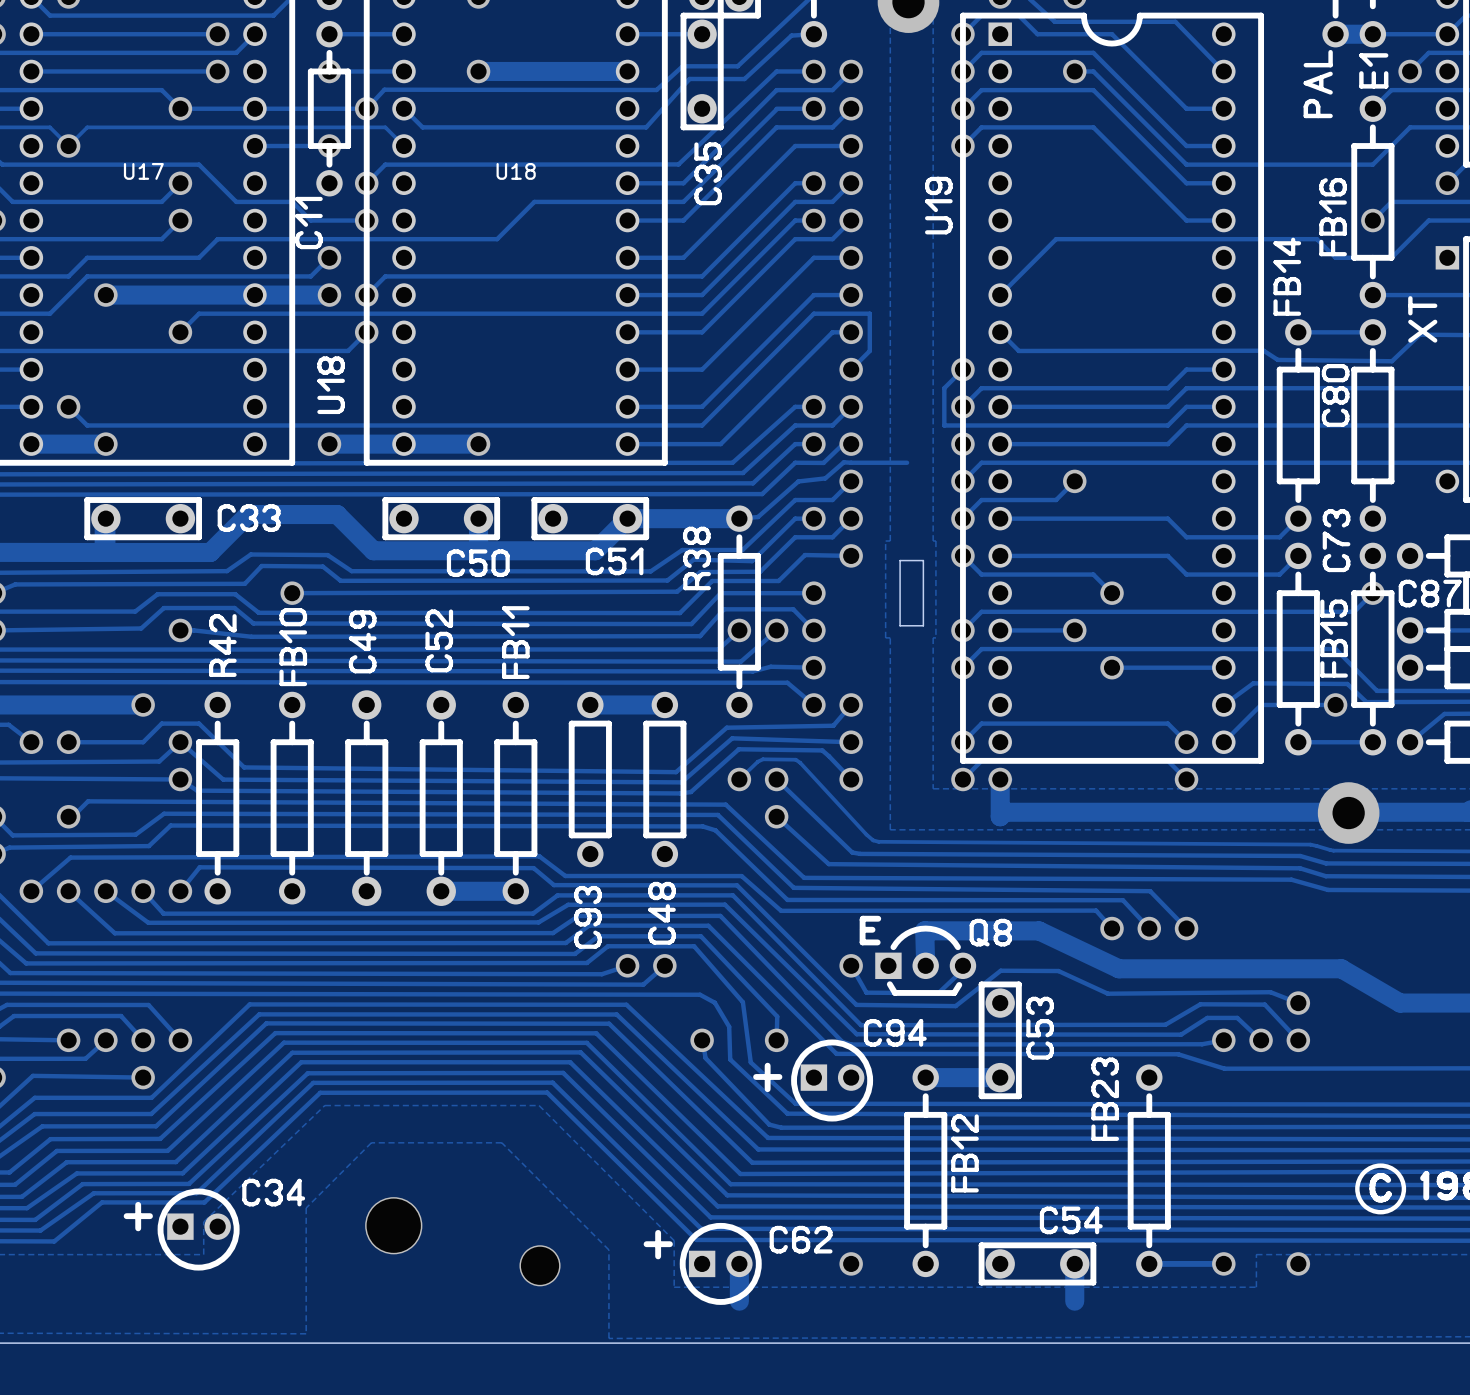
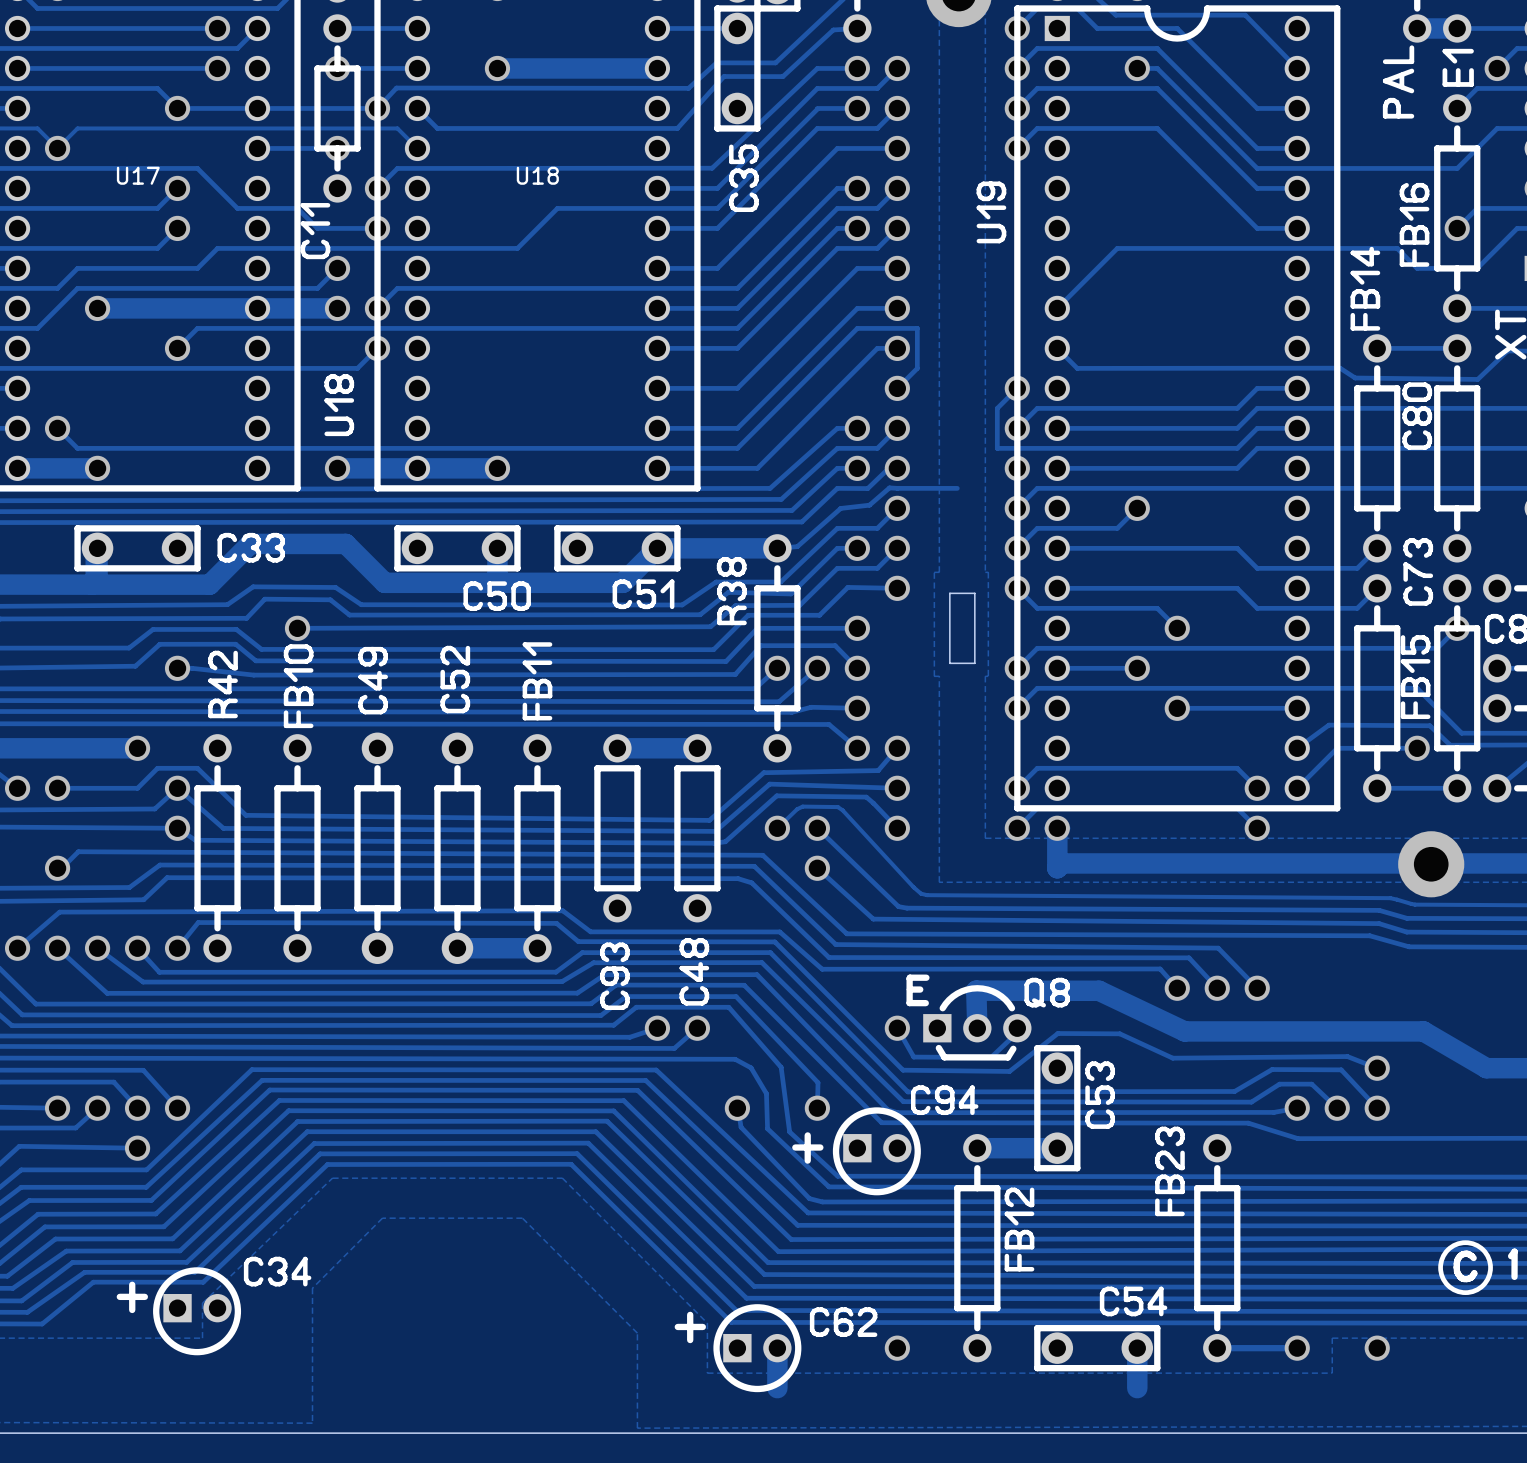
via: (393, 1225) -> none
via: (540, 1265) -> none

